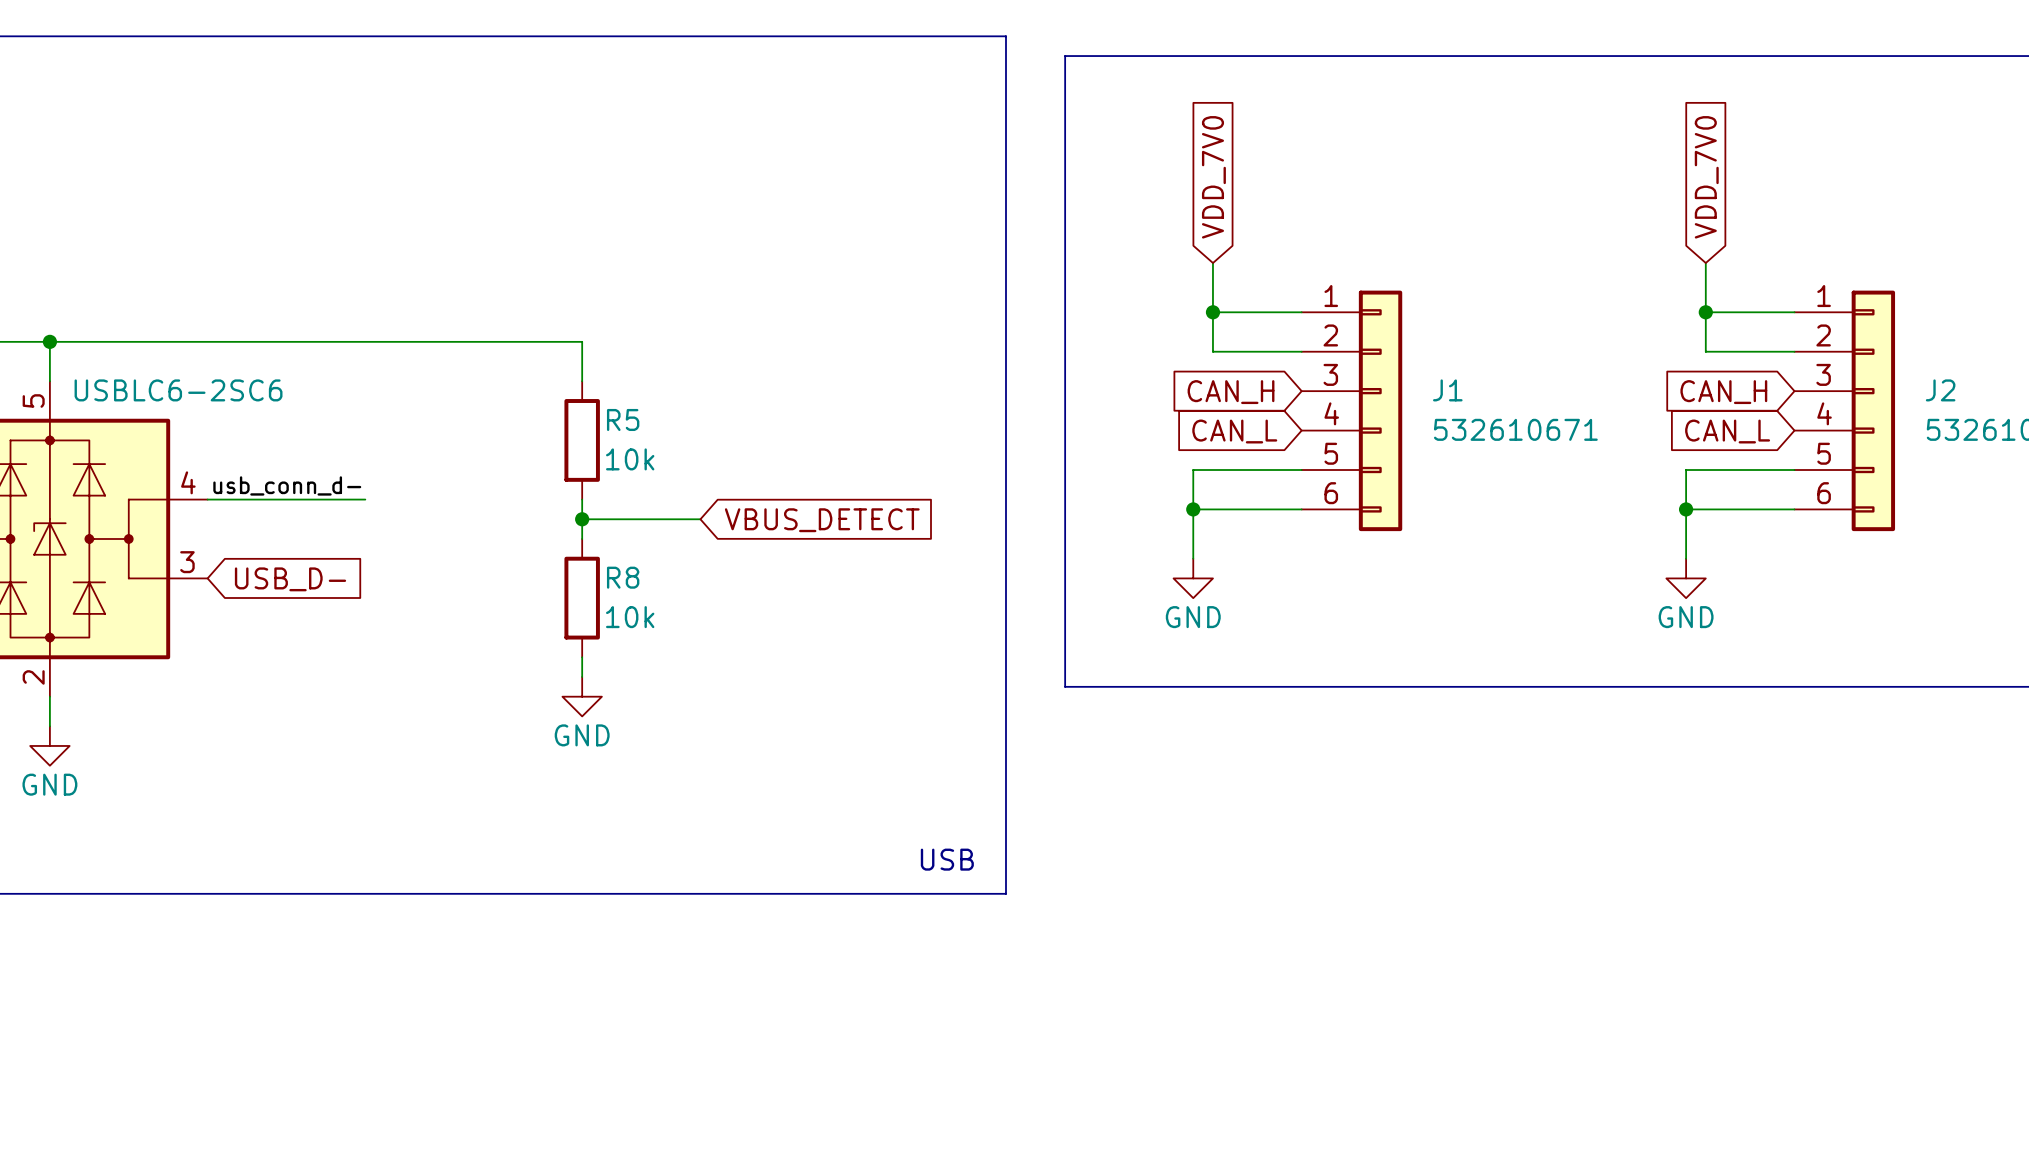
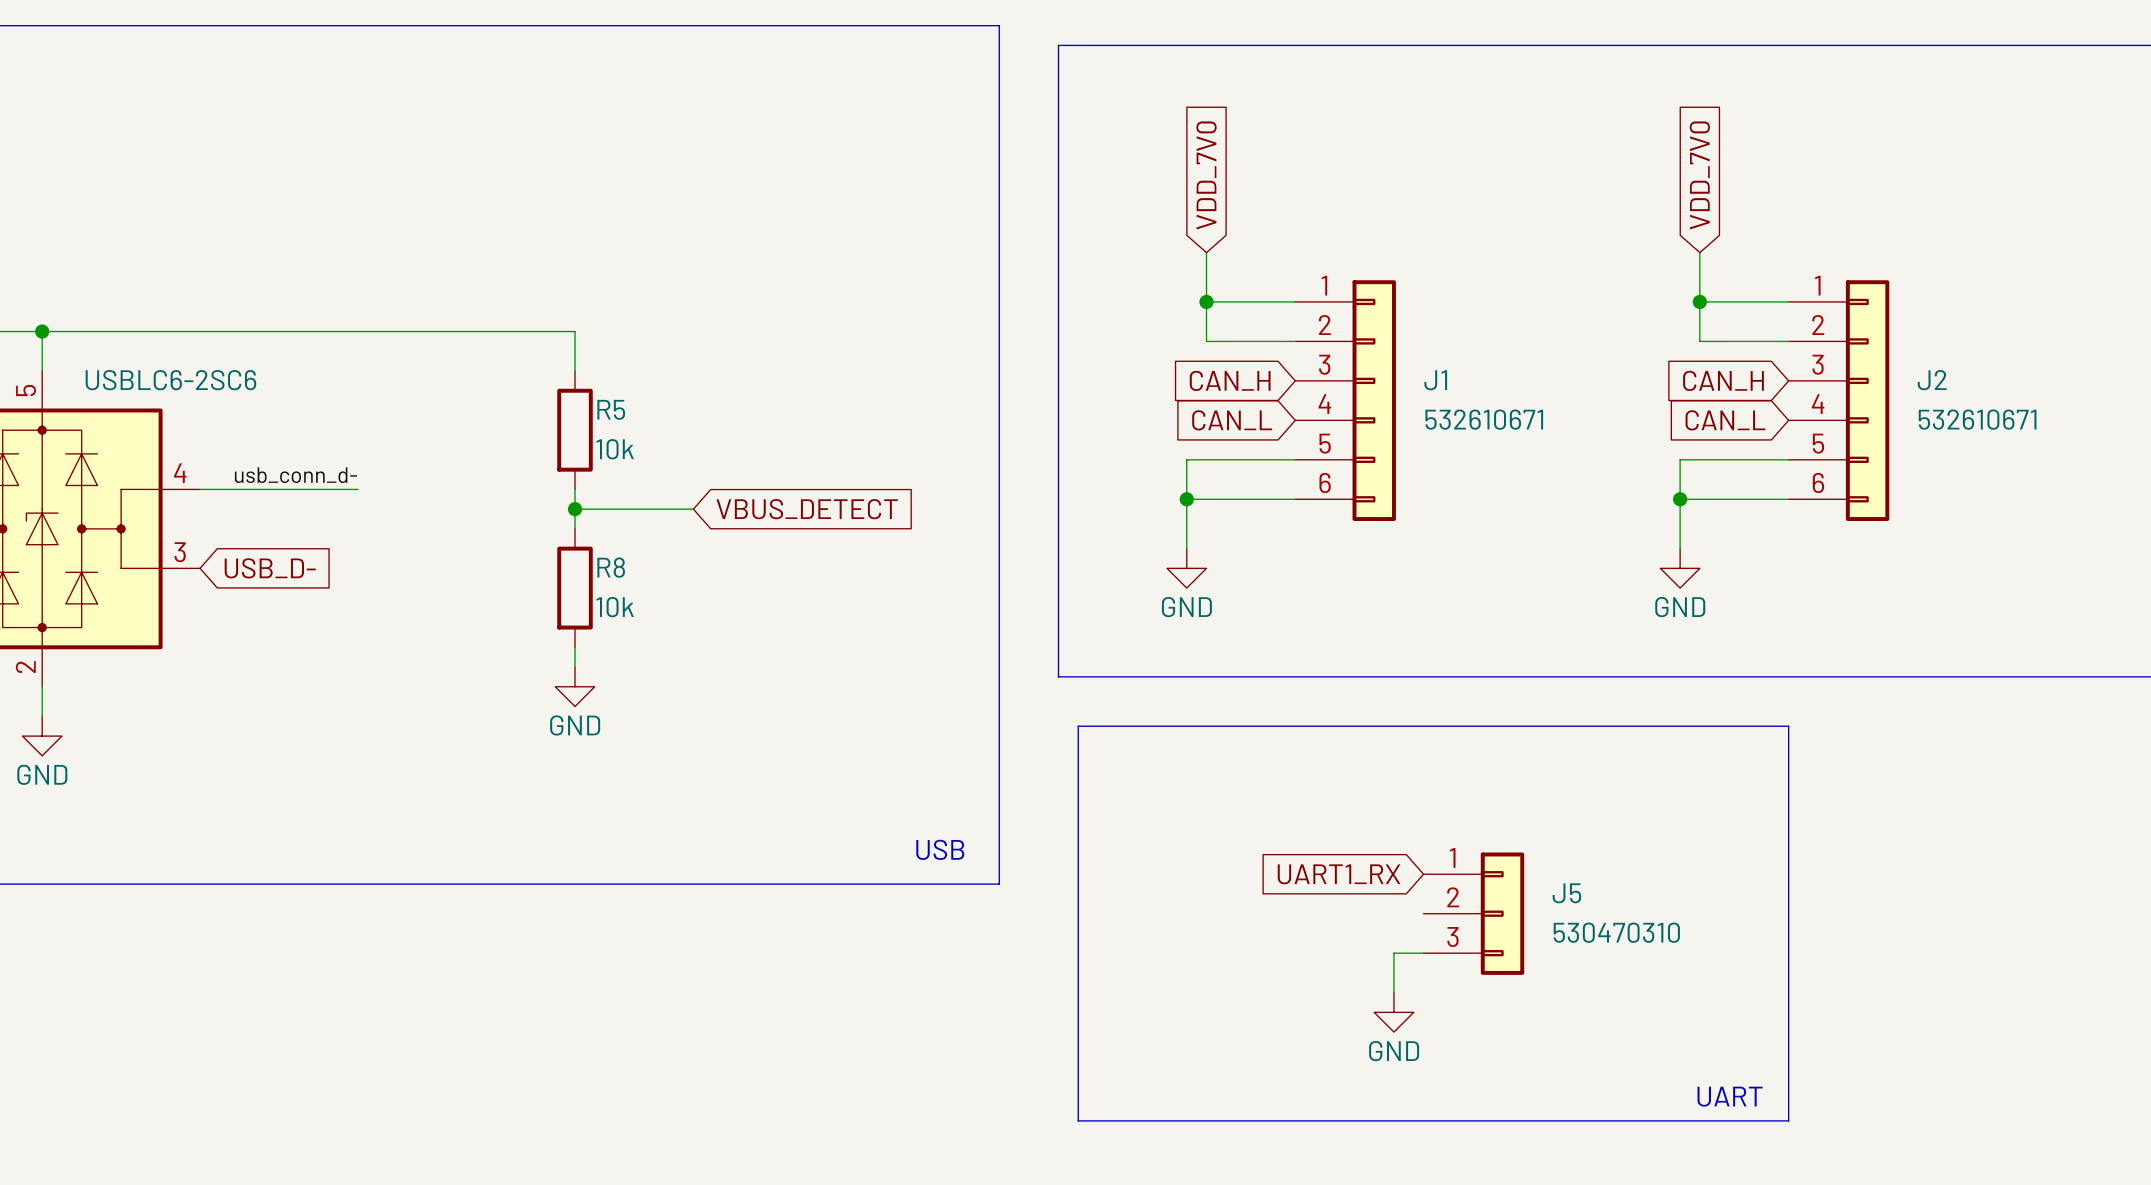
line: none -> (1078, 726) (1078, 1120) (1788, 1120) (1788, 726) (1078, 726)
global label: none -> UART1_RX (1339, 874)
J5: none -> 530470310 (1473, 913)
wire: none -> (1423, 953) (1393, 953) (1393, 992)
power symbol: none -> GND (1393, 1012)
text: none -> UART (1730, 1096)

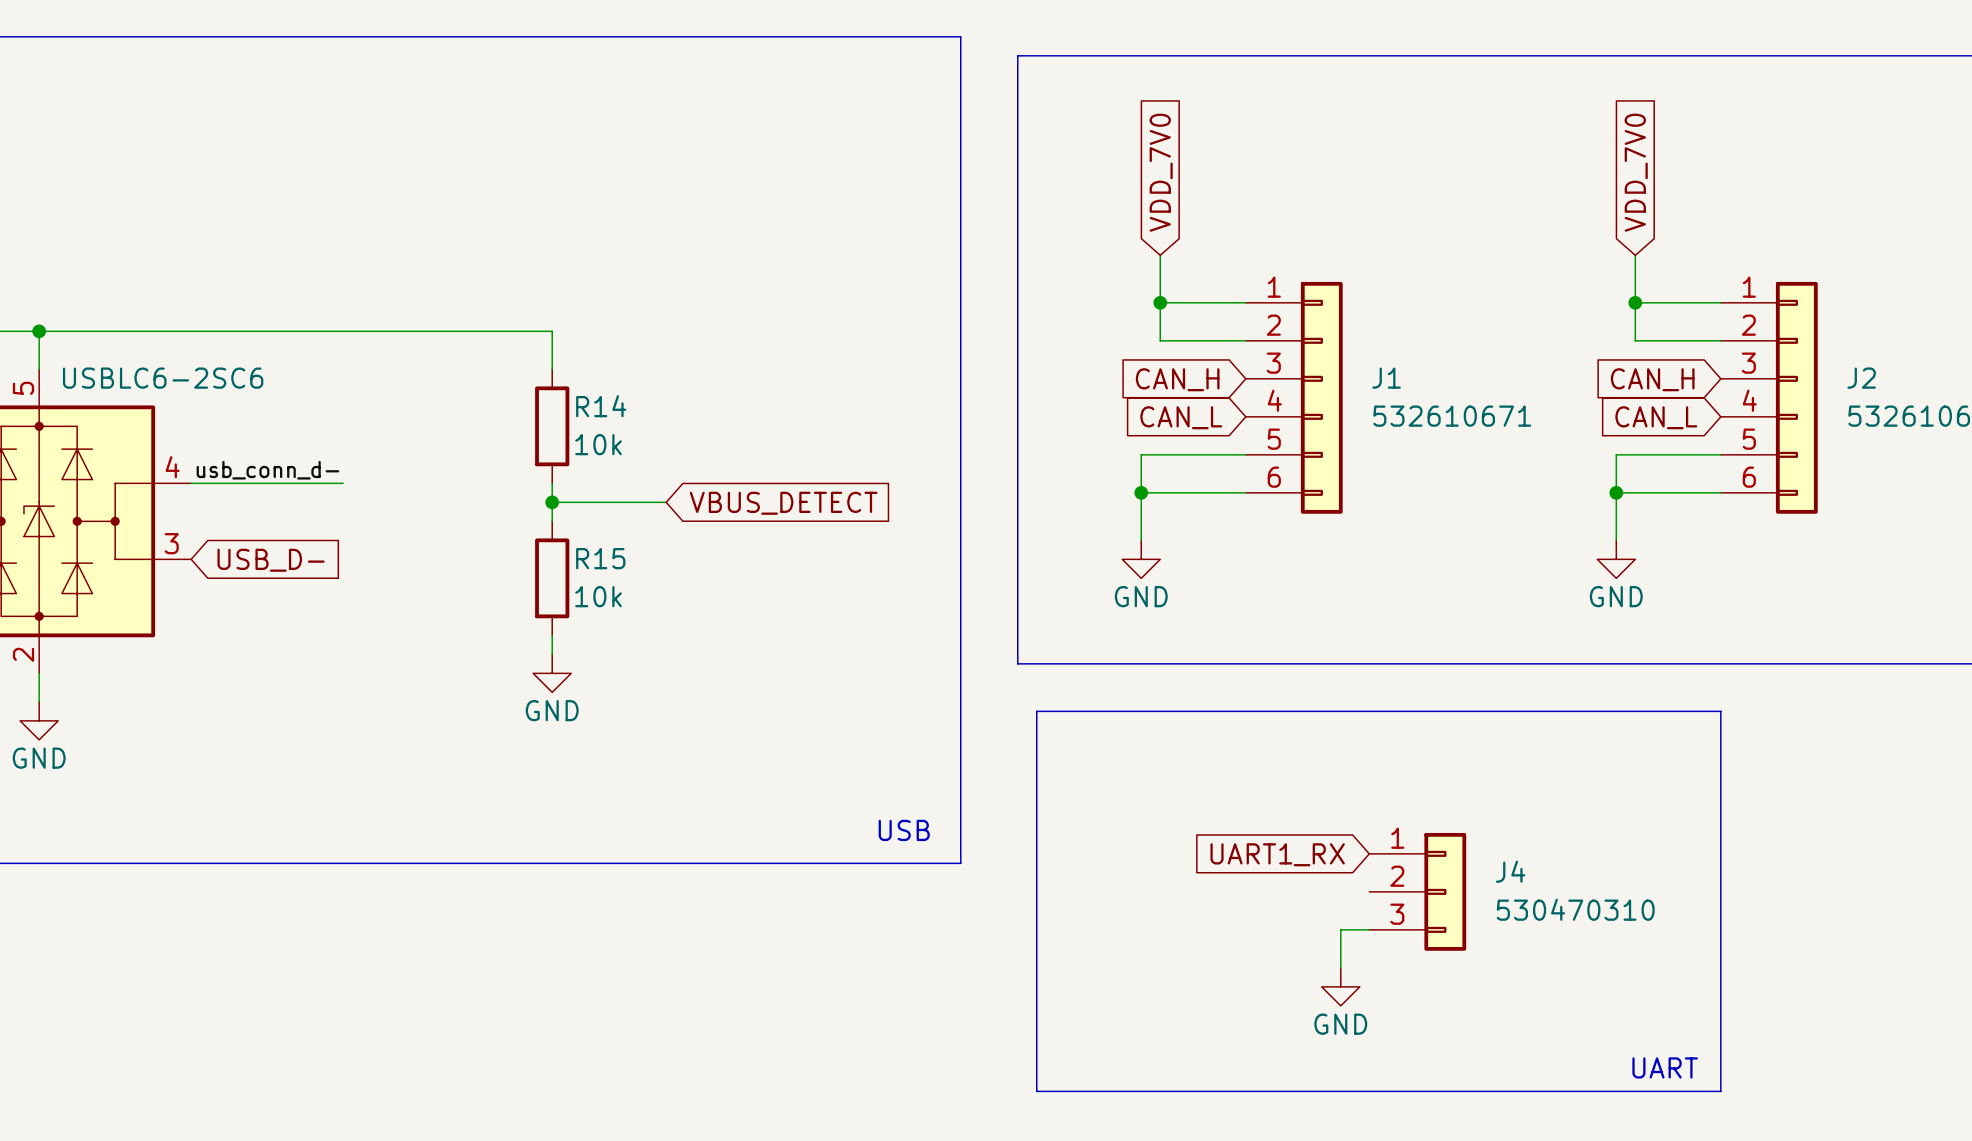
R5 name: R5 (611, 409) -> R14 (601, 406)
R8 name: R8 (611, 567) -> R15 (600, 558)
J5 name: J5 (1566, 893) -> J4 (1510, 871)

